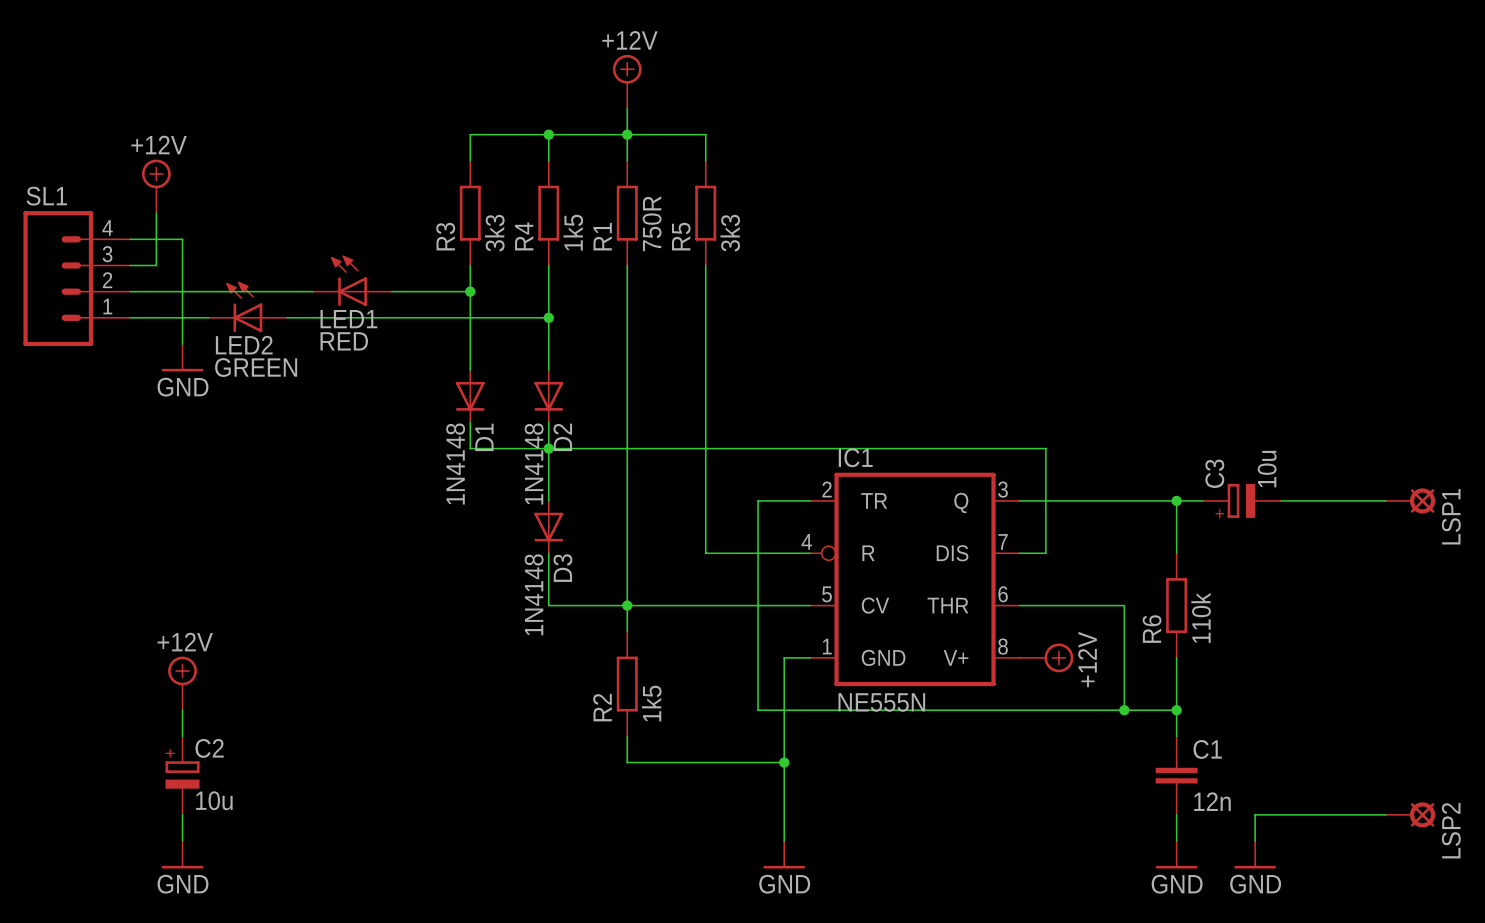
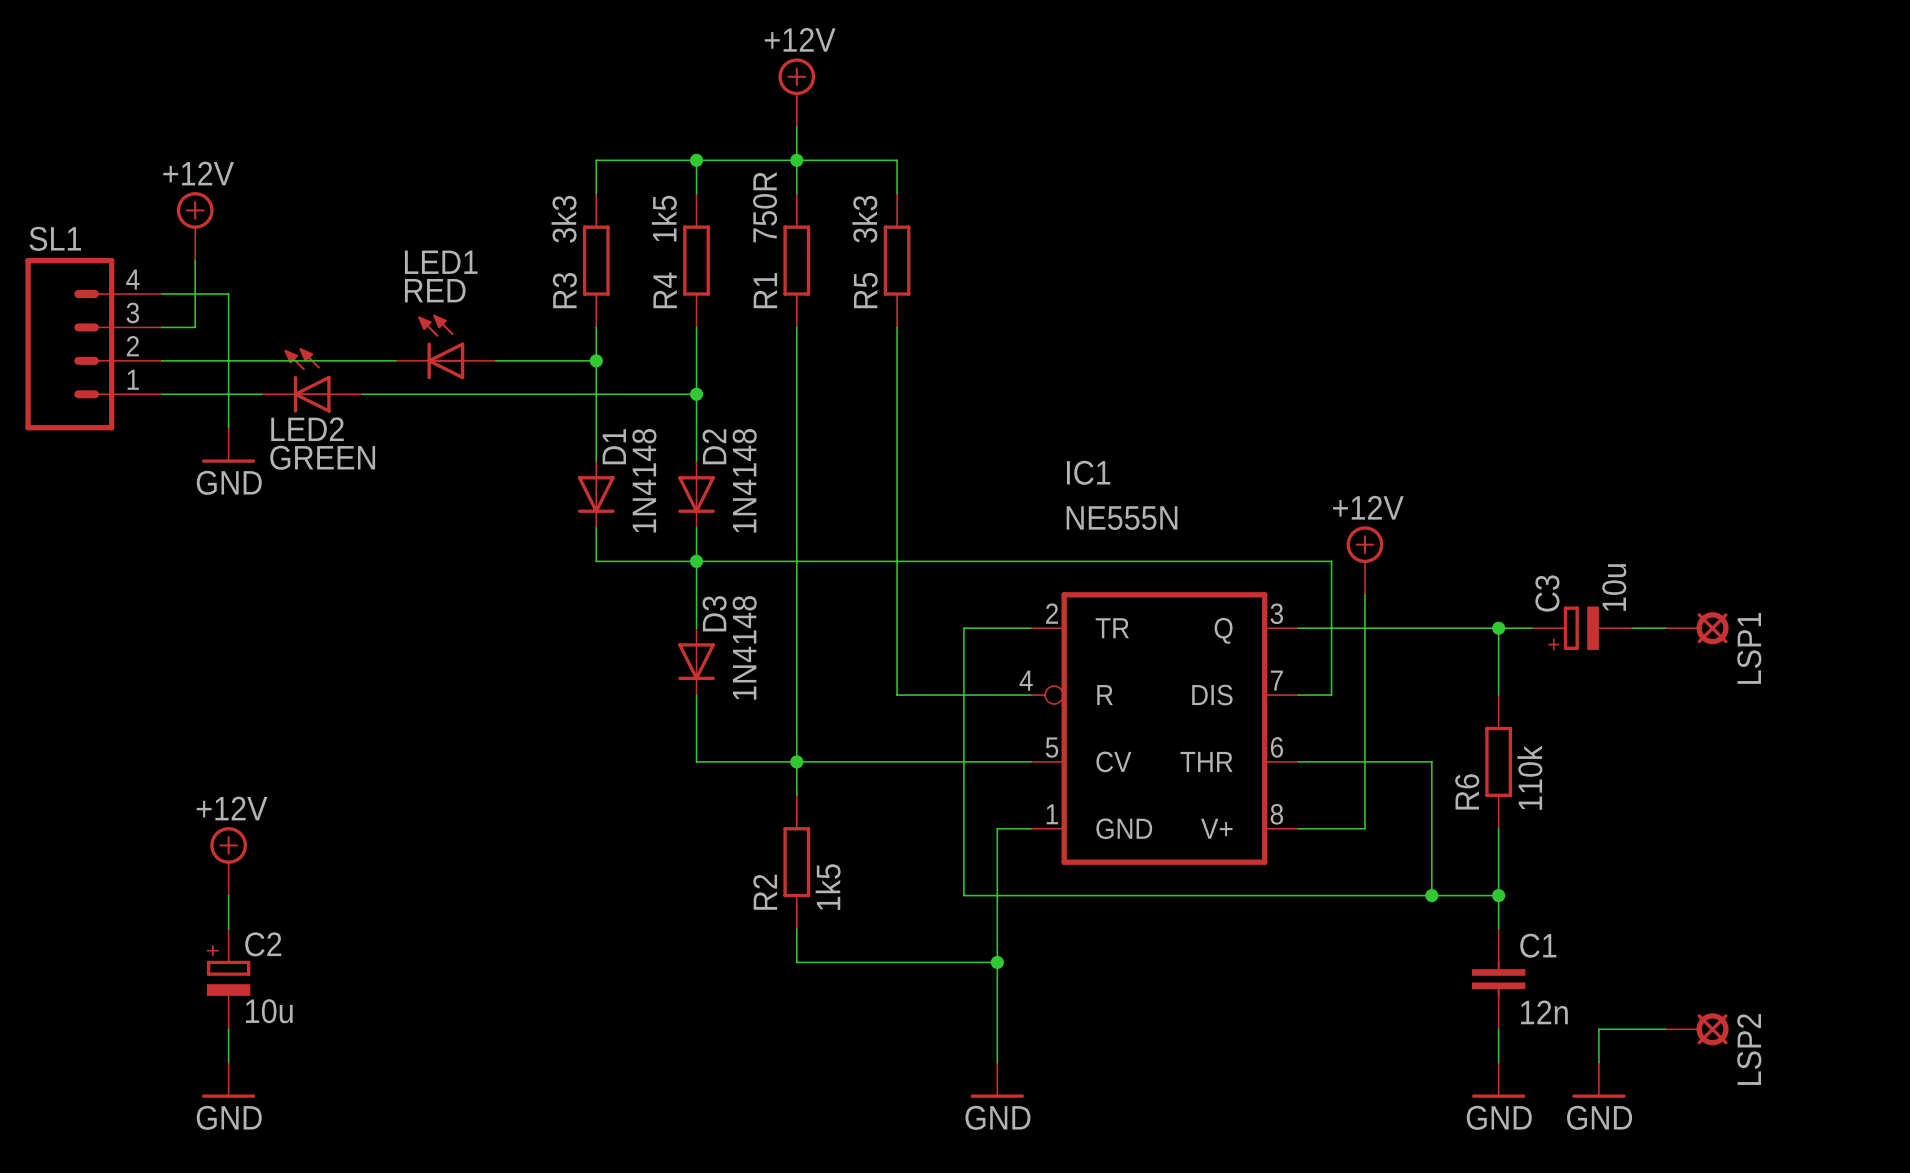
R1 value position: 750R (652, 223) -> 750R (765, 207)
R4 value position: 1k5 (573, 232) -> 1k5 (664, 218)
R3 value position: 3k3 (494, 233) -> 3k3 (564, 219)
R5 value position: 3k3 (730, 233) -> 3k3 (864, 219)
LED1 name position: LED1 (348, 319) -> LED1 (441, 262)
LED1 value position: RED (344, 341) -> RED (435, 290)
D1 name position: D1 (484, 437) -> D1 (614, 446)
D2 name position: D2 (562, 437) -> D2 (714, 446)
IC1 name position: IC1 (855, 457) -> IC1 (1088, 472)
D1 value position: 1N4148 (455, 464) -> 1N4148 (644, 480)
D2 value position: 1N4148 (534, 464) -> 1N4148 (744, 480)
wire: none -> (1364, 594) (1364, 828) (1298, 828)
wire: (1307, 500) (1385, 500) -> none
LSP1 position: (1410, 500) -> (1697, 628)
D3 name position: D3 (562, 568) -> D3 (714, 613)
D3 value position: 1N4148 (534, 594) -> 1N4148 (744, 647)
power symbol position: +12V (1046, 657) -> +12V (1364, 560)
power symbol rotation: 0° (1058, 657) -> 90° counterclockwise (1364, 544)
IC1 value position: NE555N (881, 702) -> NE555N (1122, 518)
wire: (1307, 814) (1385, 814) -> none
LSP2 position: (1410, 814) -> (1697, 1029)

